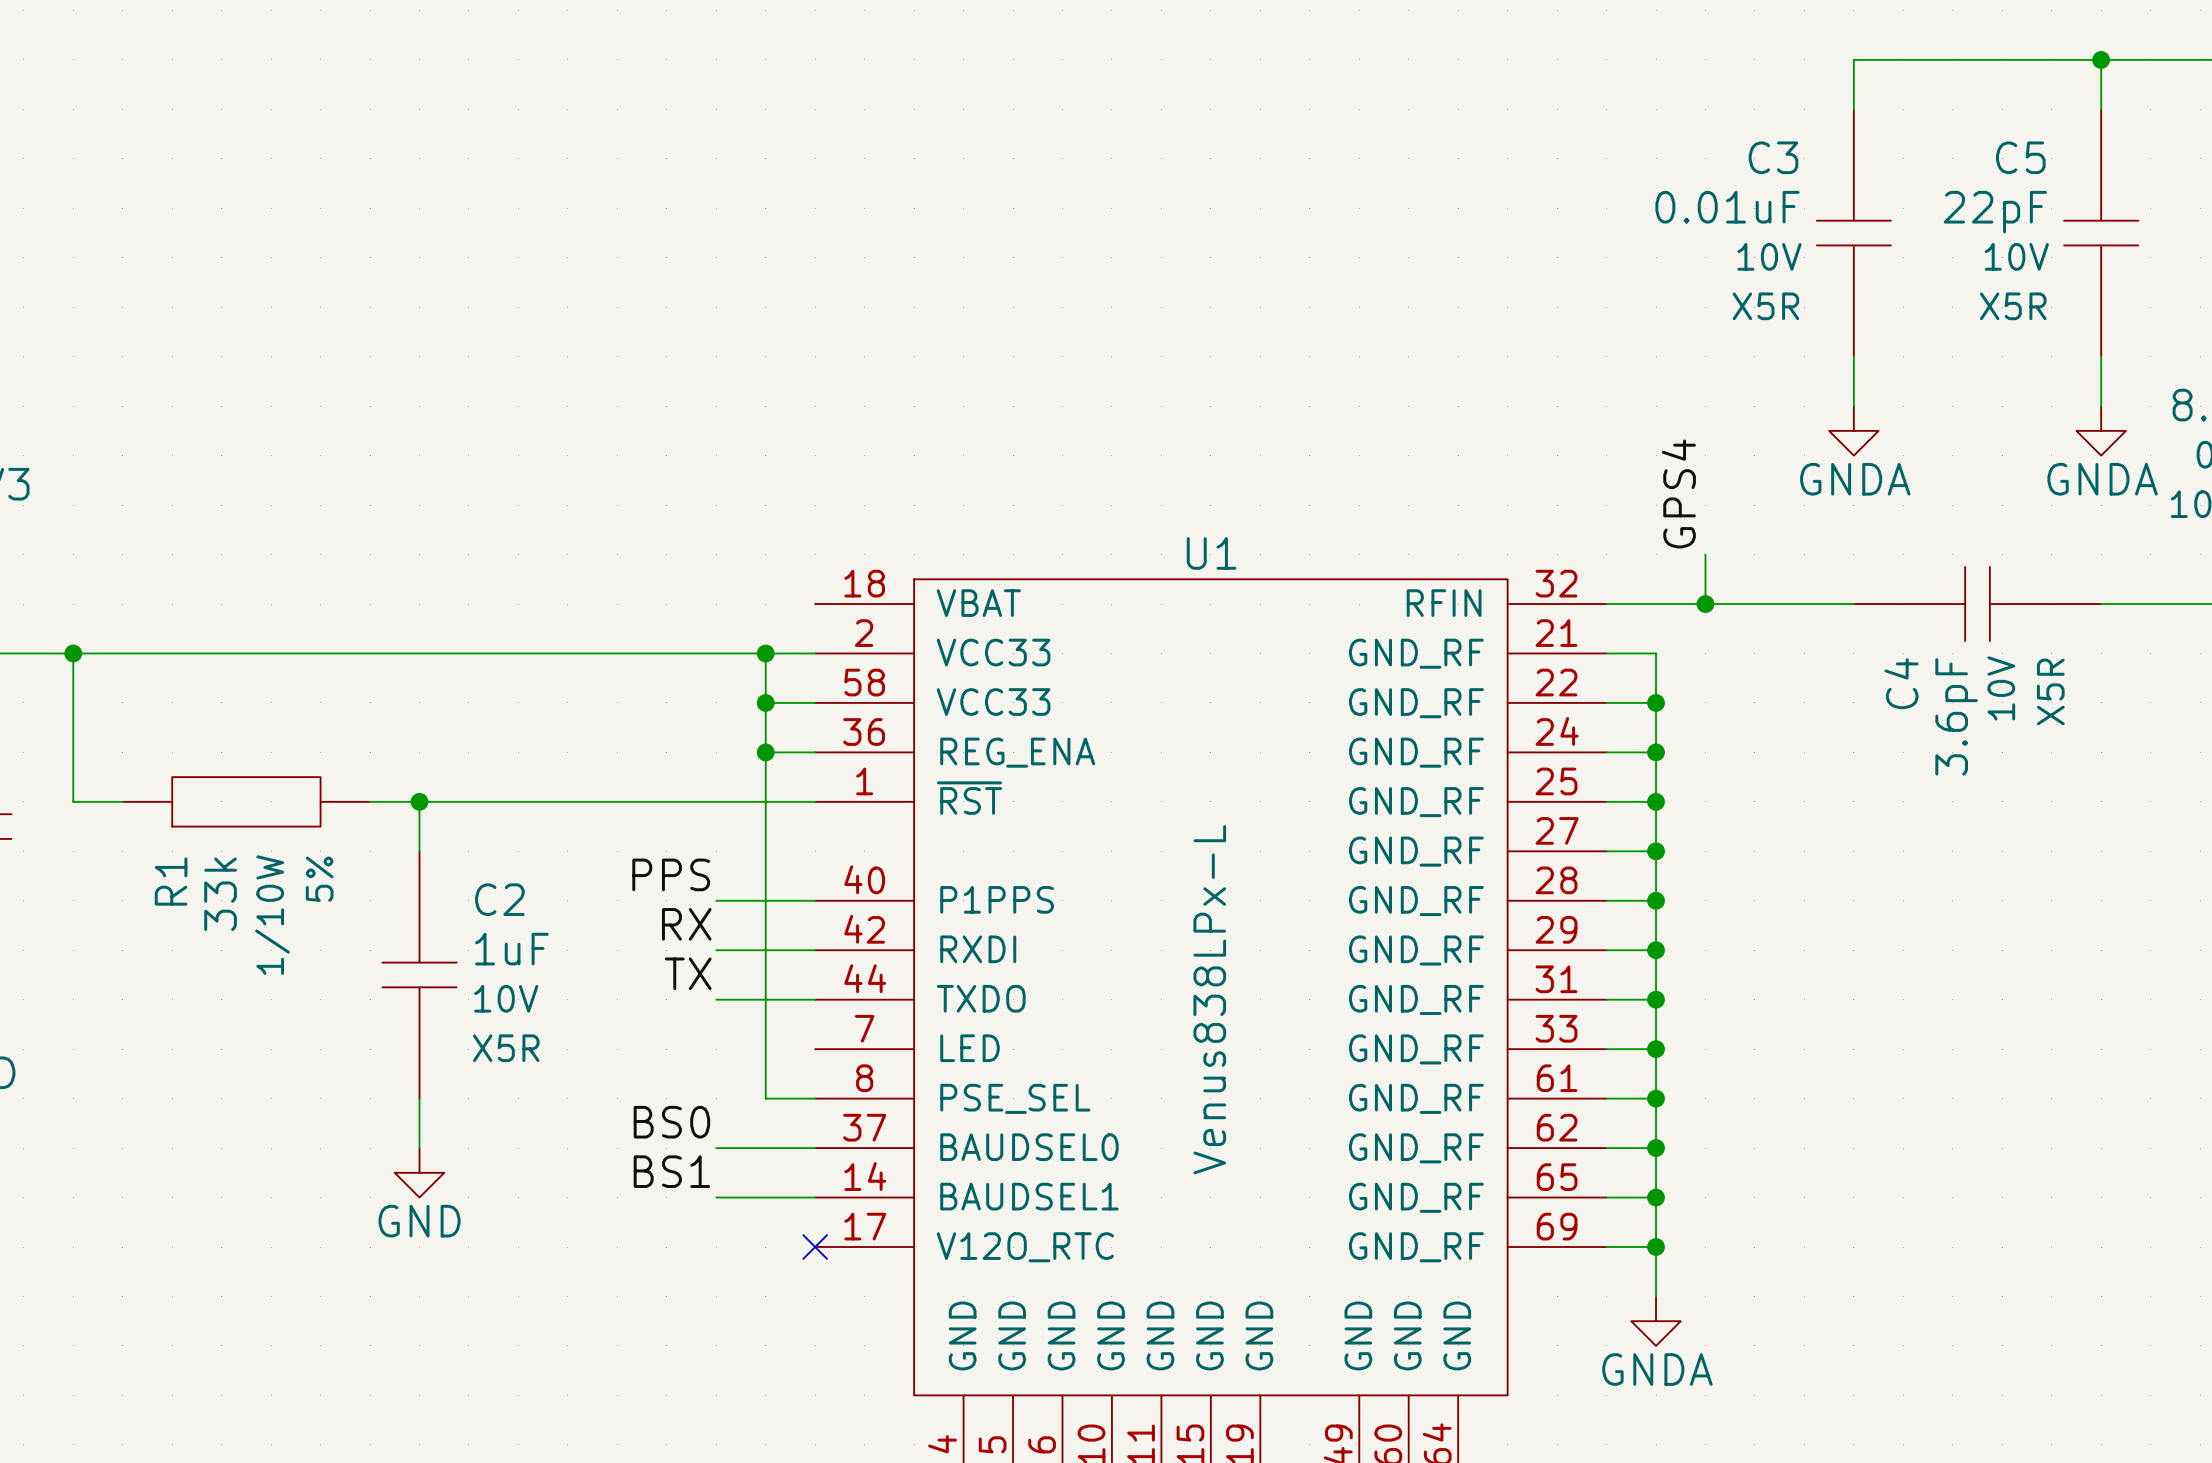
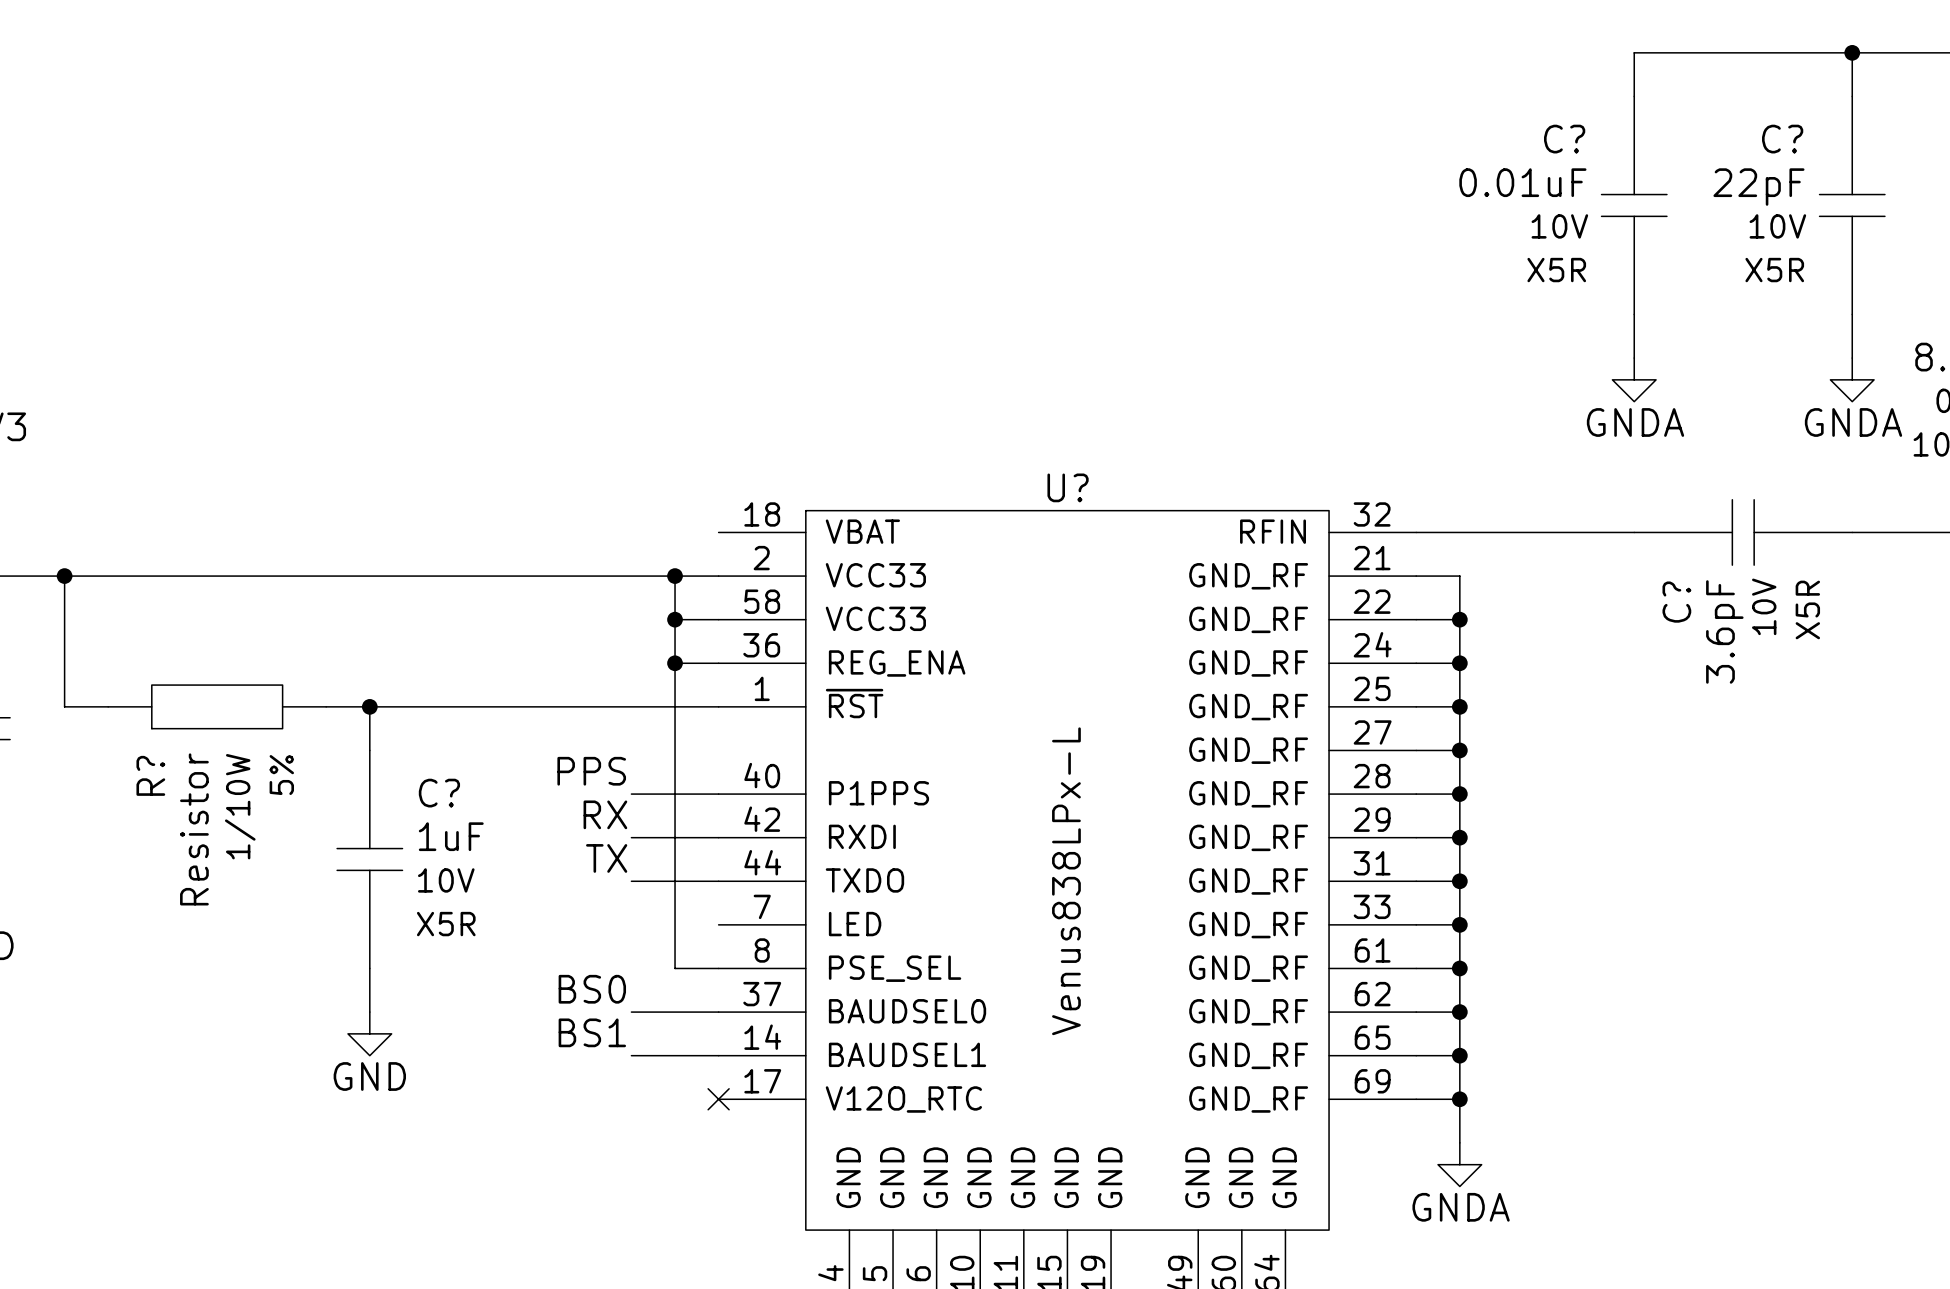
C3 name: C3 (1773, 157) -> C? (1564, 139)
C5 name: C5 (2020, 157) -> C? (1782, 139)
label: GPS4 (1678, 493) -> none
U1 name: U1 (1211, 553) -> U? (1068, 487)
wire: (1705, 554) (1705, 604) -> none
junction: (1705, 604) -> none
C4 name: C4 (1901, 683) -> C? (1676, 602)
R1 name: R1 (171, 881) -> R? (150, 775)
R1 value: 33k (220, 894) -> Resistor (194, 829)
C2 name: C2 (499, 899) -> C? (439, 793)

